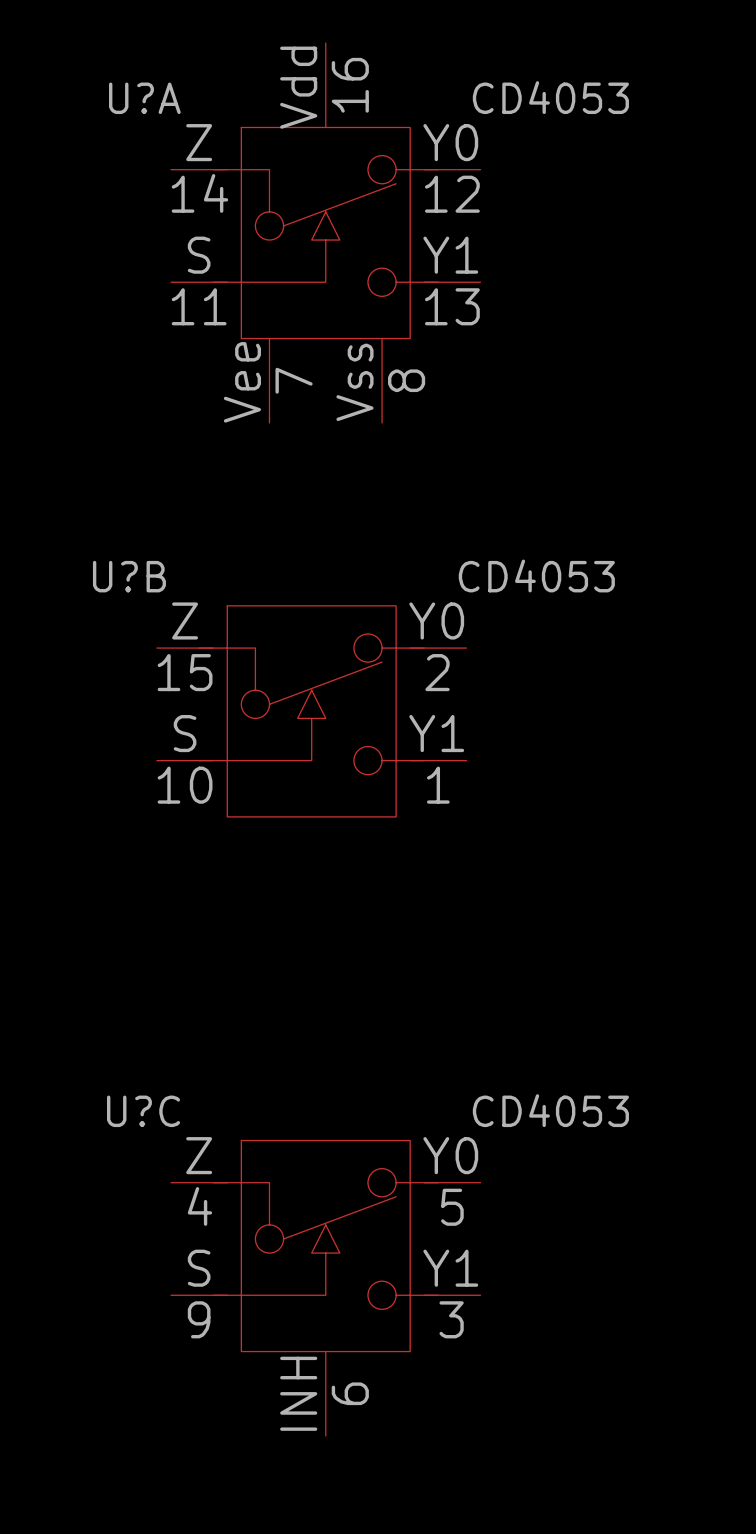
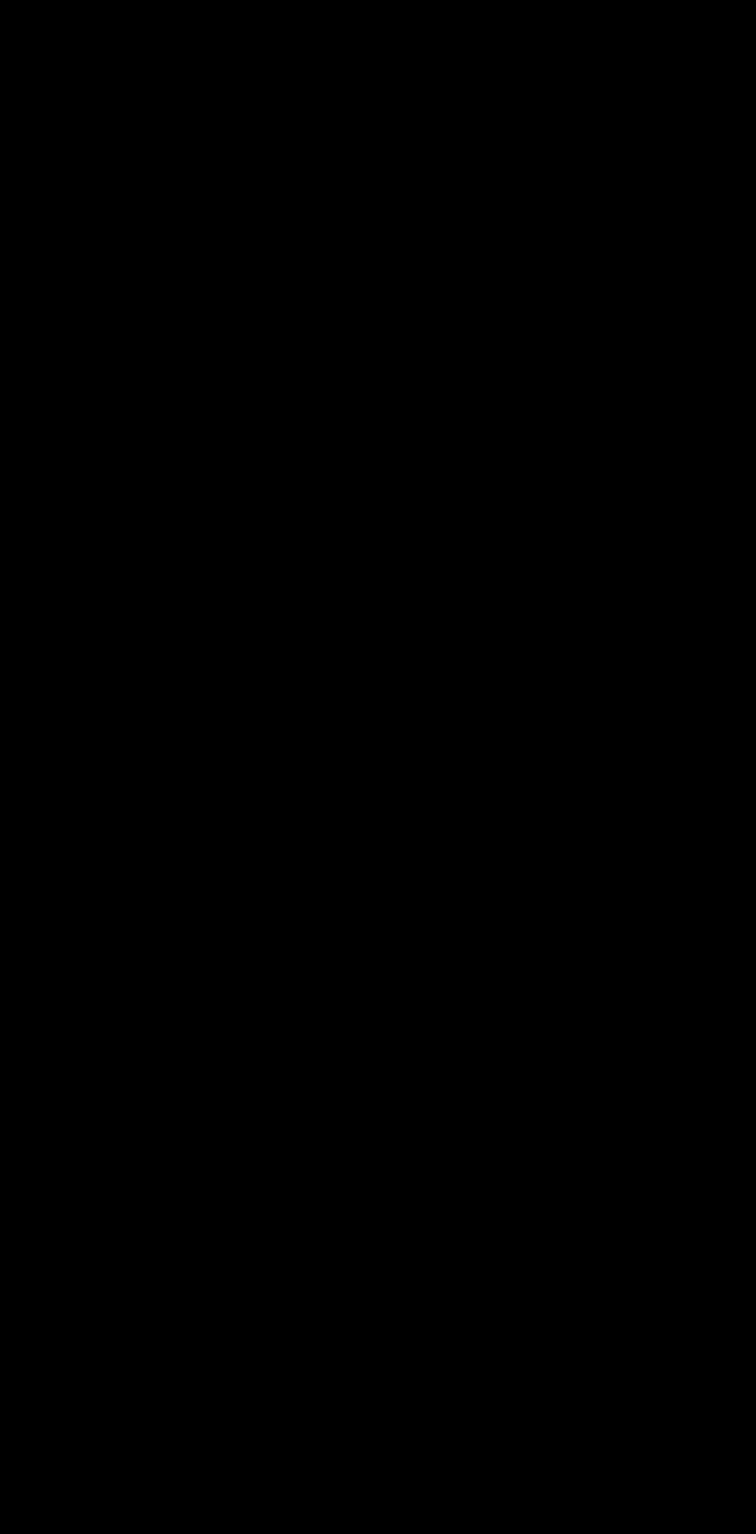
U?A: CD4053 (325, 233) -> none
U?B: CD4053 (311, 711) -> none
U?C: CD4053 (325, 1288) -> none

